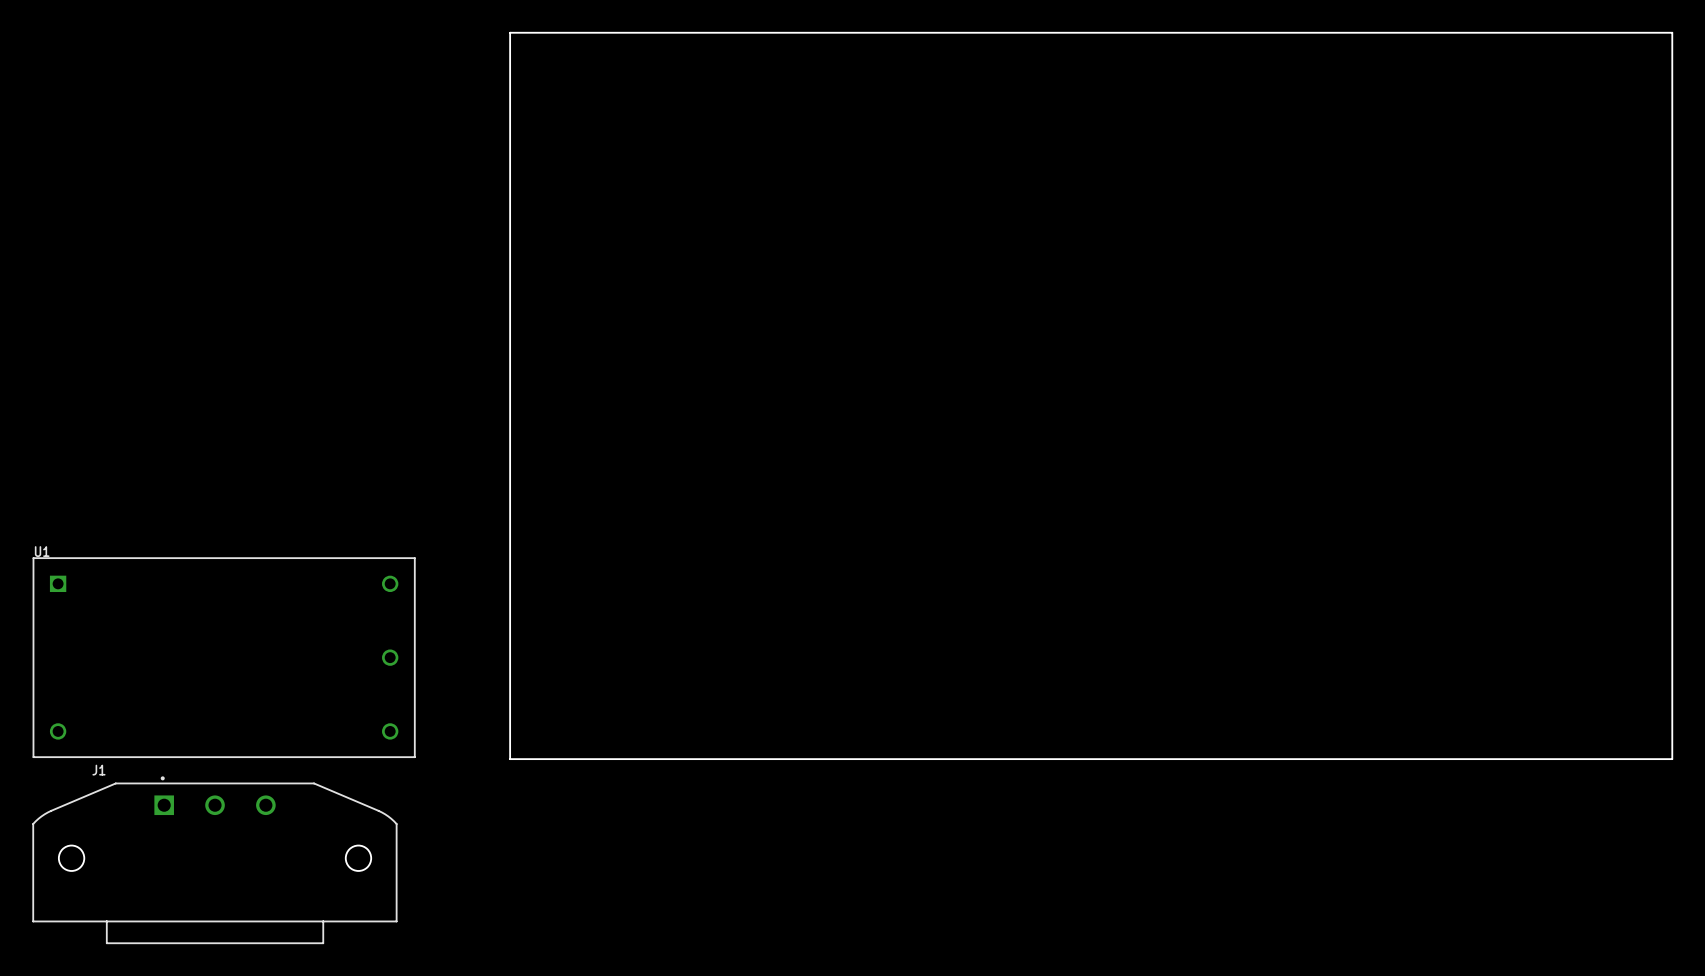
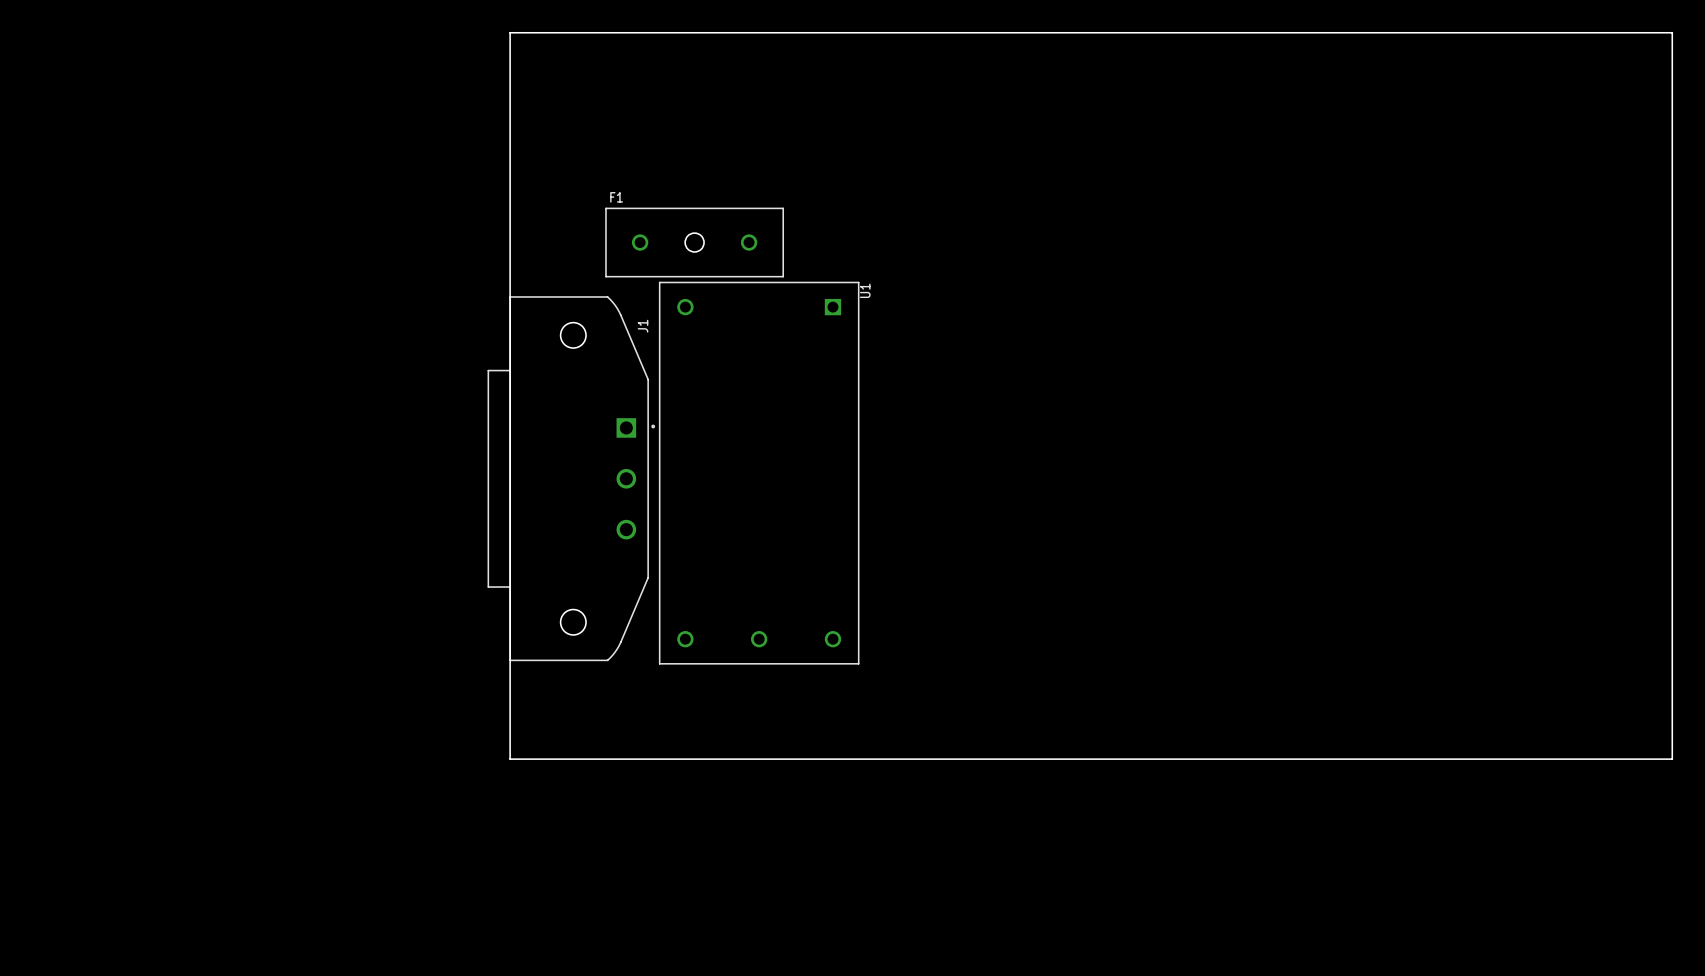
F1: none -> (694, 242)
U1 rotation: 0° (224, 657) -> 90° clockwise (759, 473)
U1 position: (224, 657) -> (759, 473)
J1 name position: J1 (98, 770) -> J1 (643, 326)
J1 rotation: 0° (214, 860) -> 90° clockwise (571, 478)
J1 position: (214, 860) -> (571, 478)

